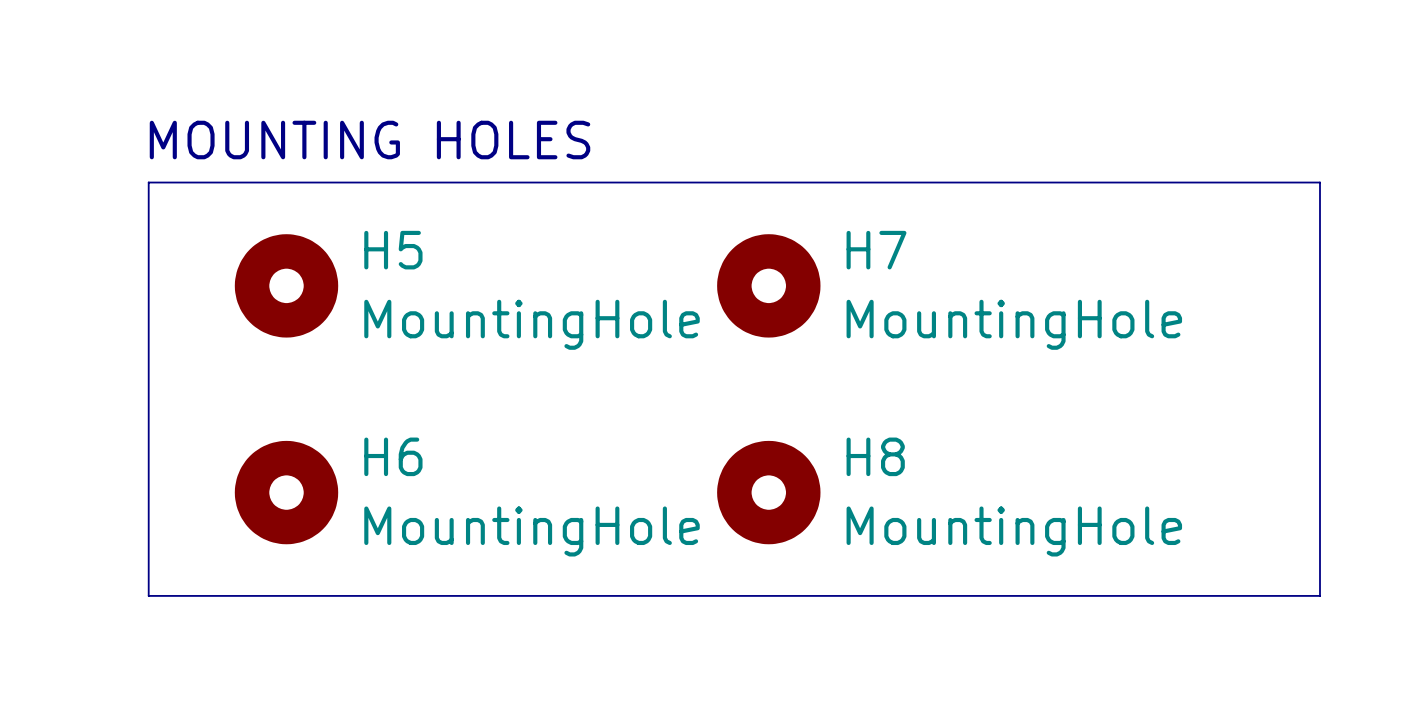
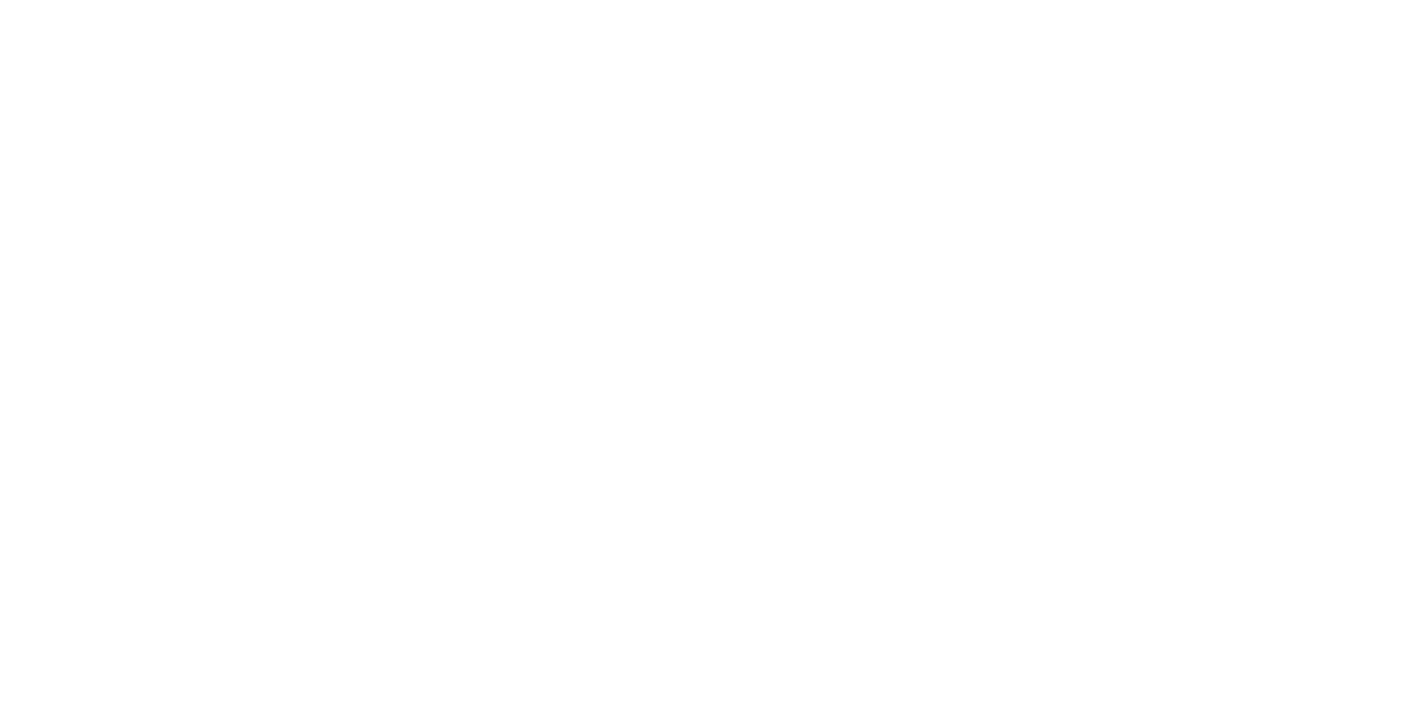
text: MOUNTING HOLES (370, 140) -> none
line: (148, 182) (1319, 182) (1319, 595) (148, 595) (148, 182) -> none
H5: MountingHole (286, 285) -> none
H7: MountingHole (768, 285) -> none
H6: MountingHole (286, 492) -> none
H8: MountingHole (768, 492) -> none

